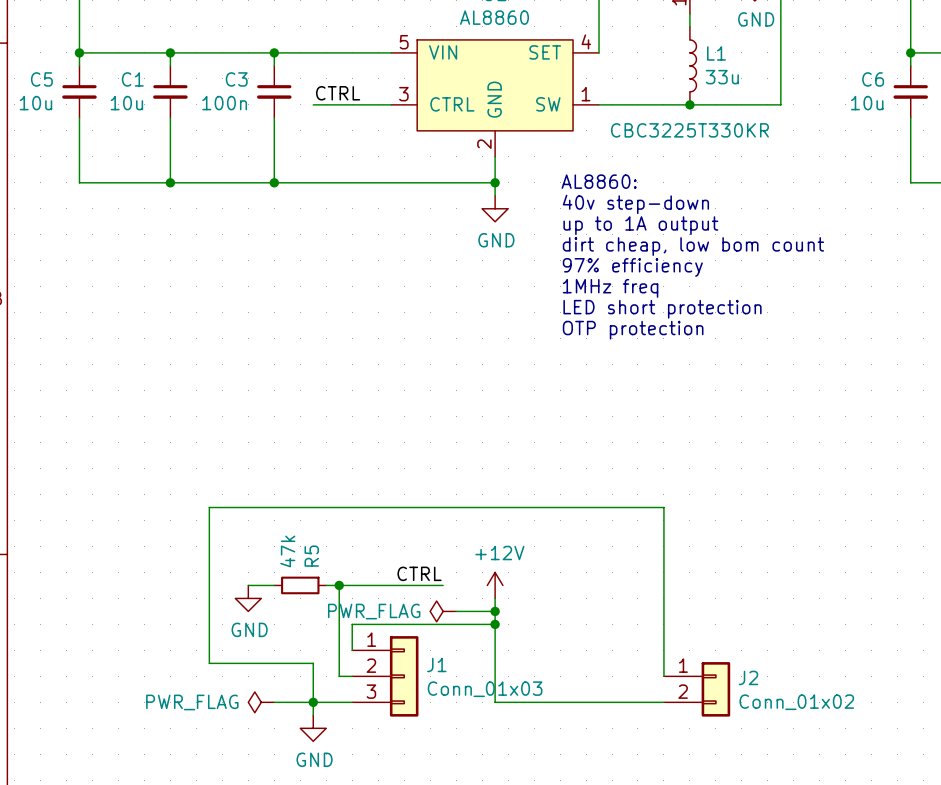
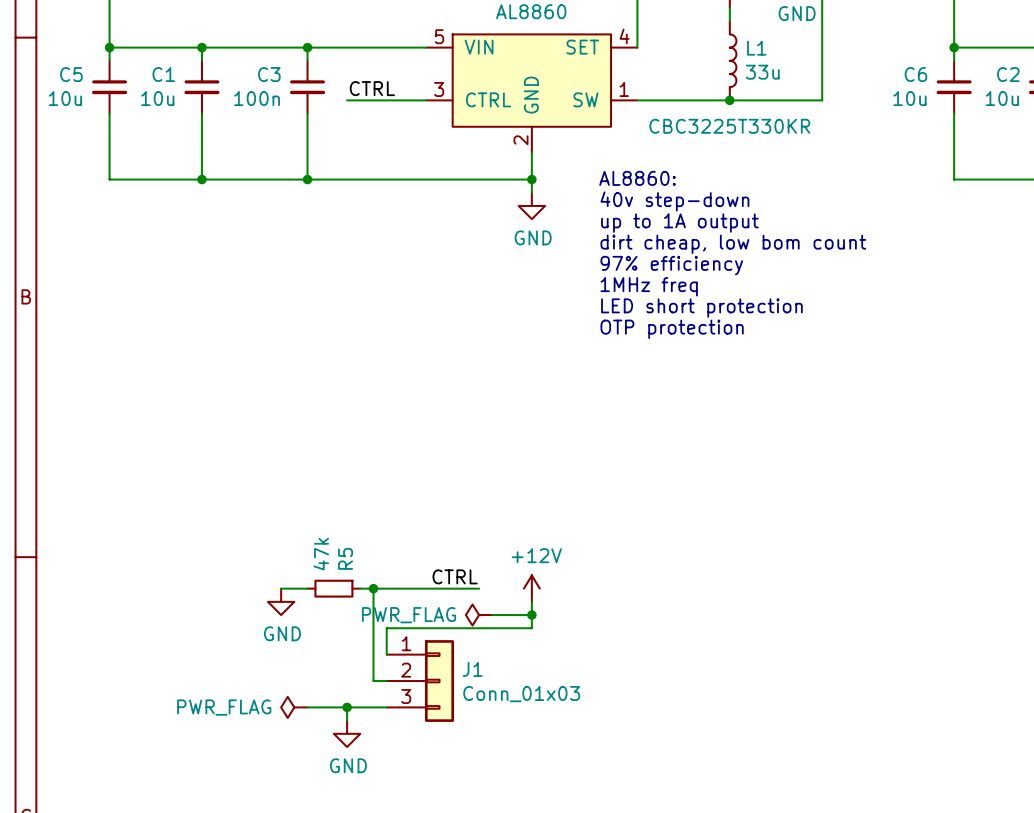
wire: (495, 624) (495, 702) (663, 702) -> none
junction: (495, 624) -> none
wire: (663, 676) (663, 507) (209, 507) (209, 663) (313, 663) (313, 702) -> none
J2: Conn_01x02 (697, 689) -> none

